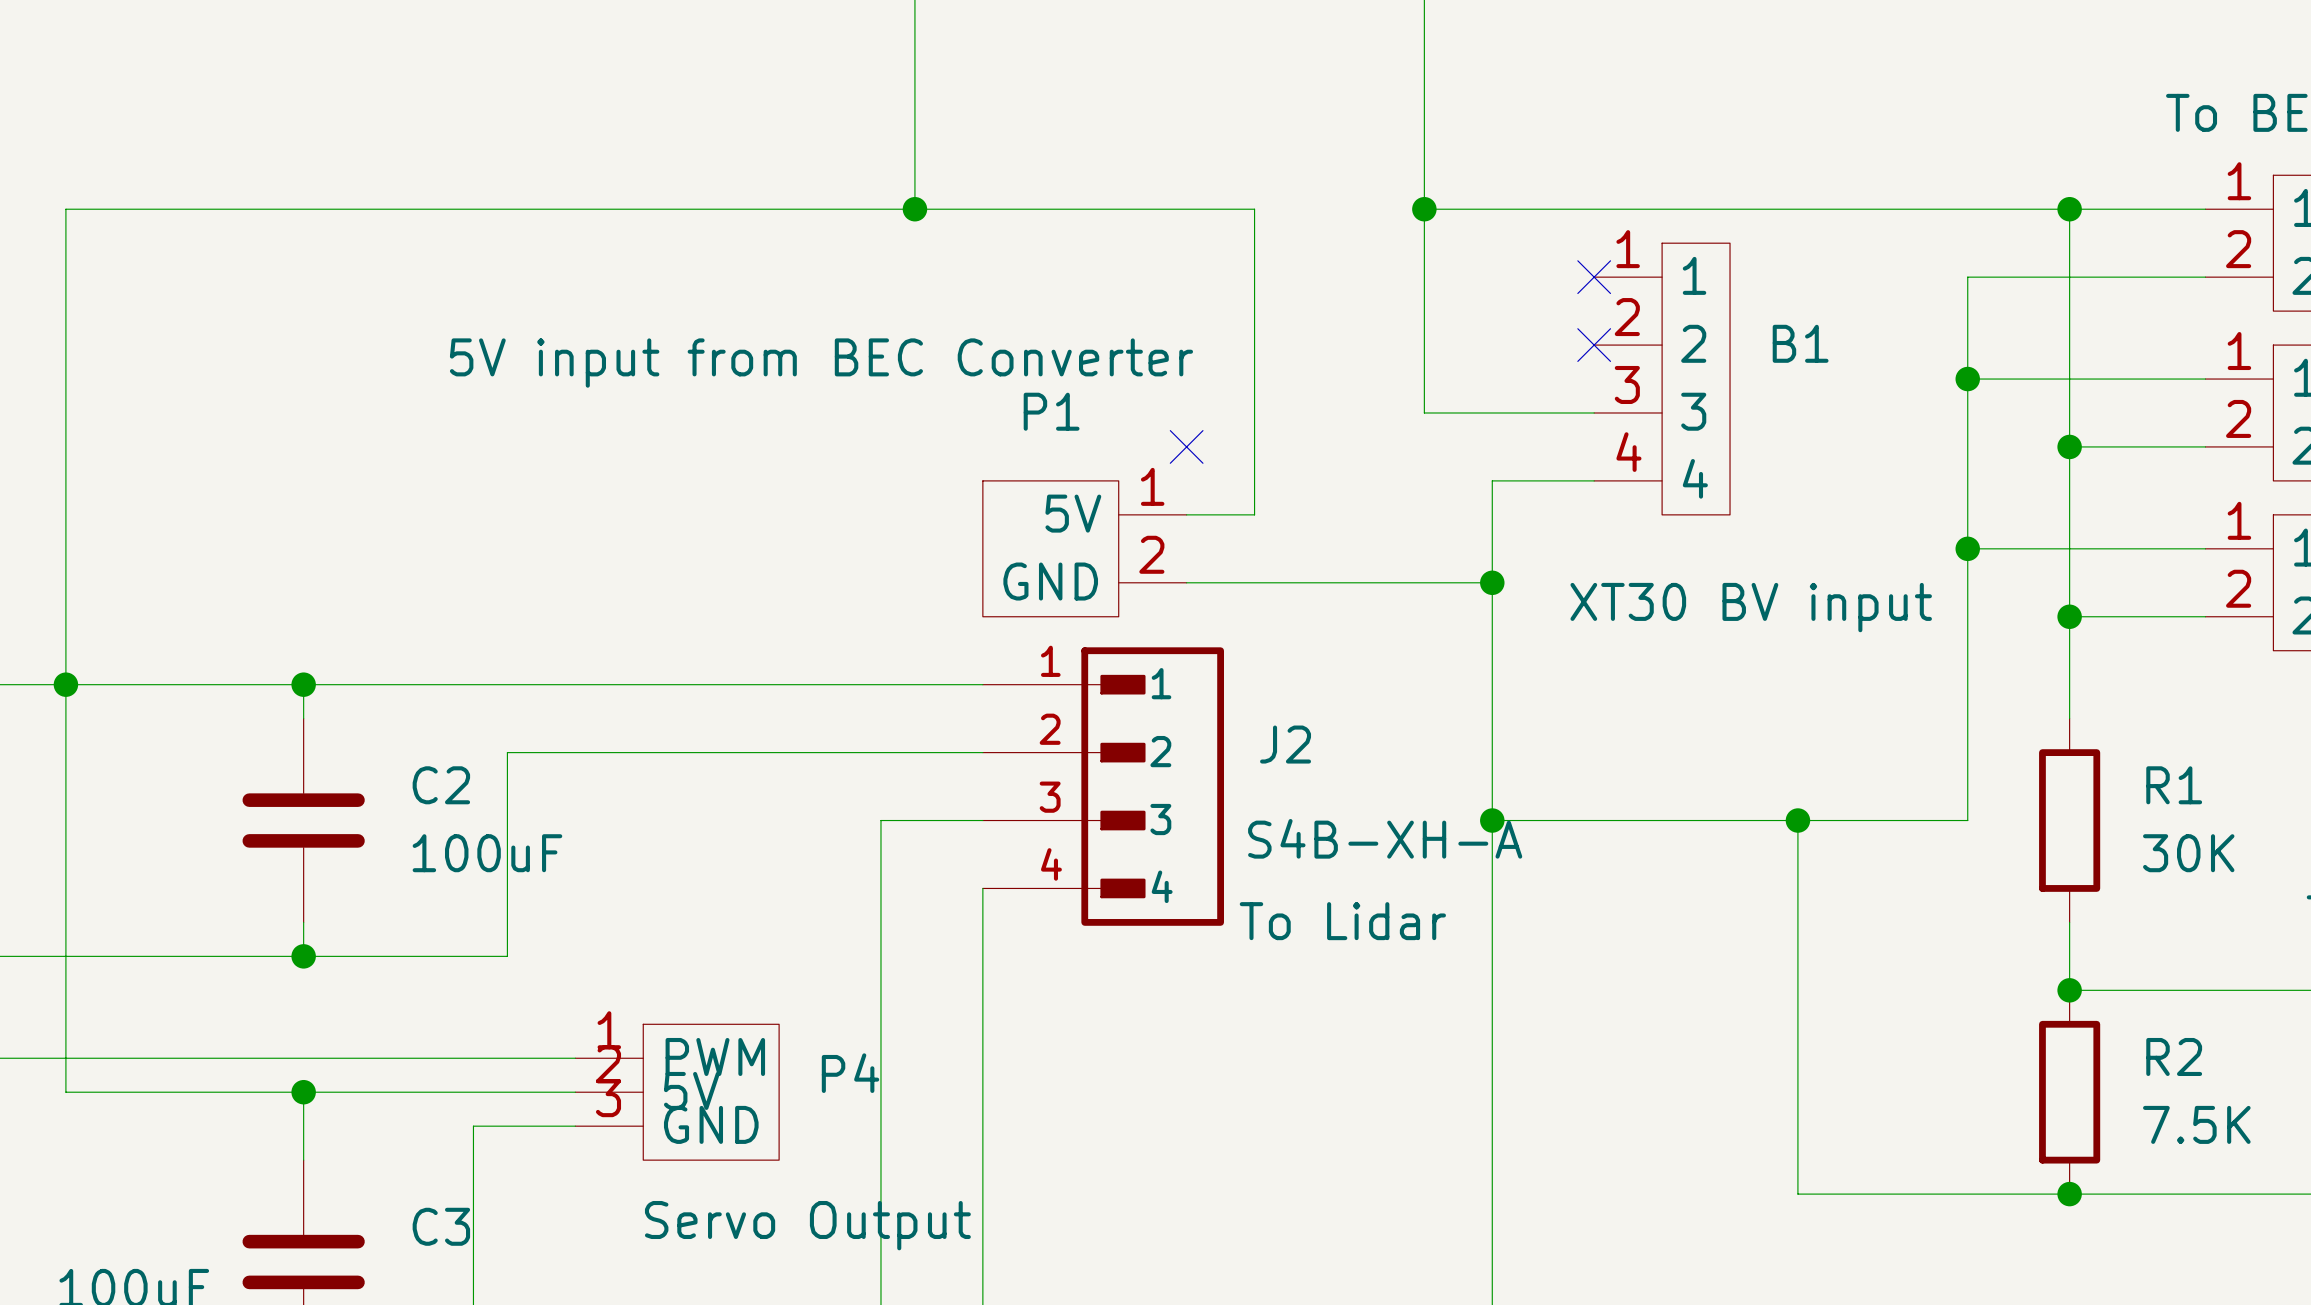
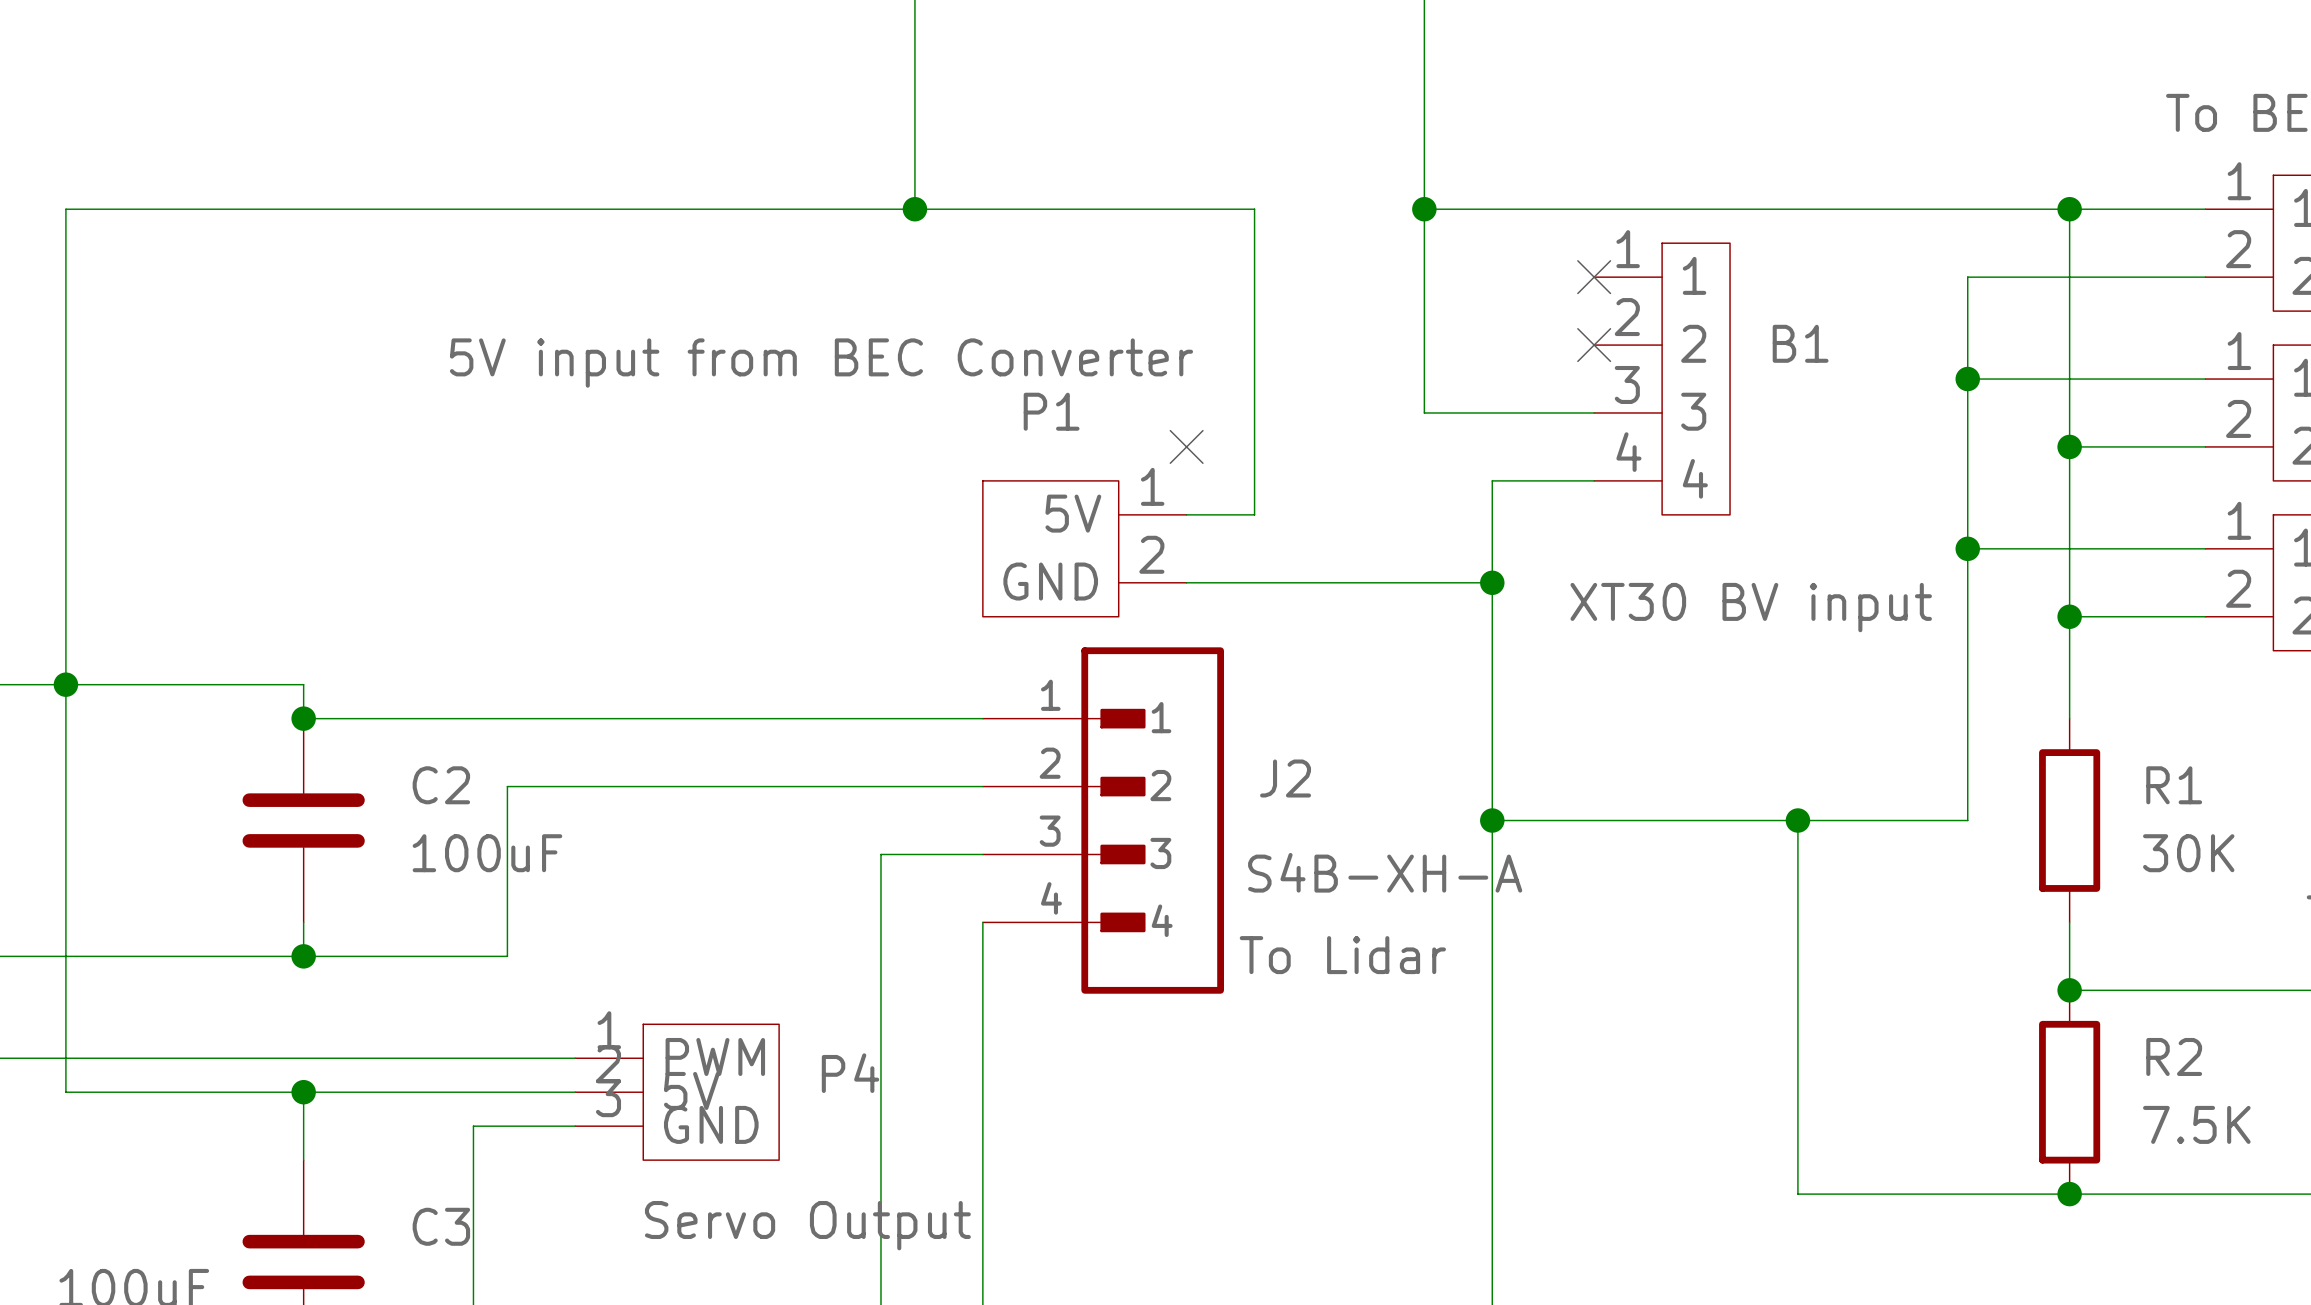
J2 symbol: [982, 647, 1224, 926] -> [982, 647, 1224, 994]
wire: (303, 684) (982, 684) -> (303, 718) (982, 718)
junction position: (303, 684) -> (303, 718)
wire: (982, 752) (507, 752) (507, 786) -> (982, 786) (507, 786)
wire: (982, 820) (880, 820) (880, 854) -> (982, 854) (880, 854)
wire: (982, 888) (982, 922) -> none

